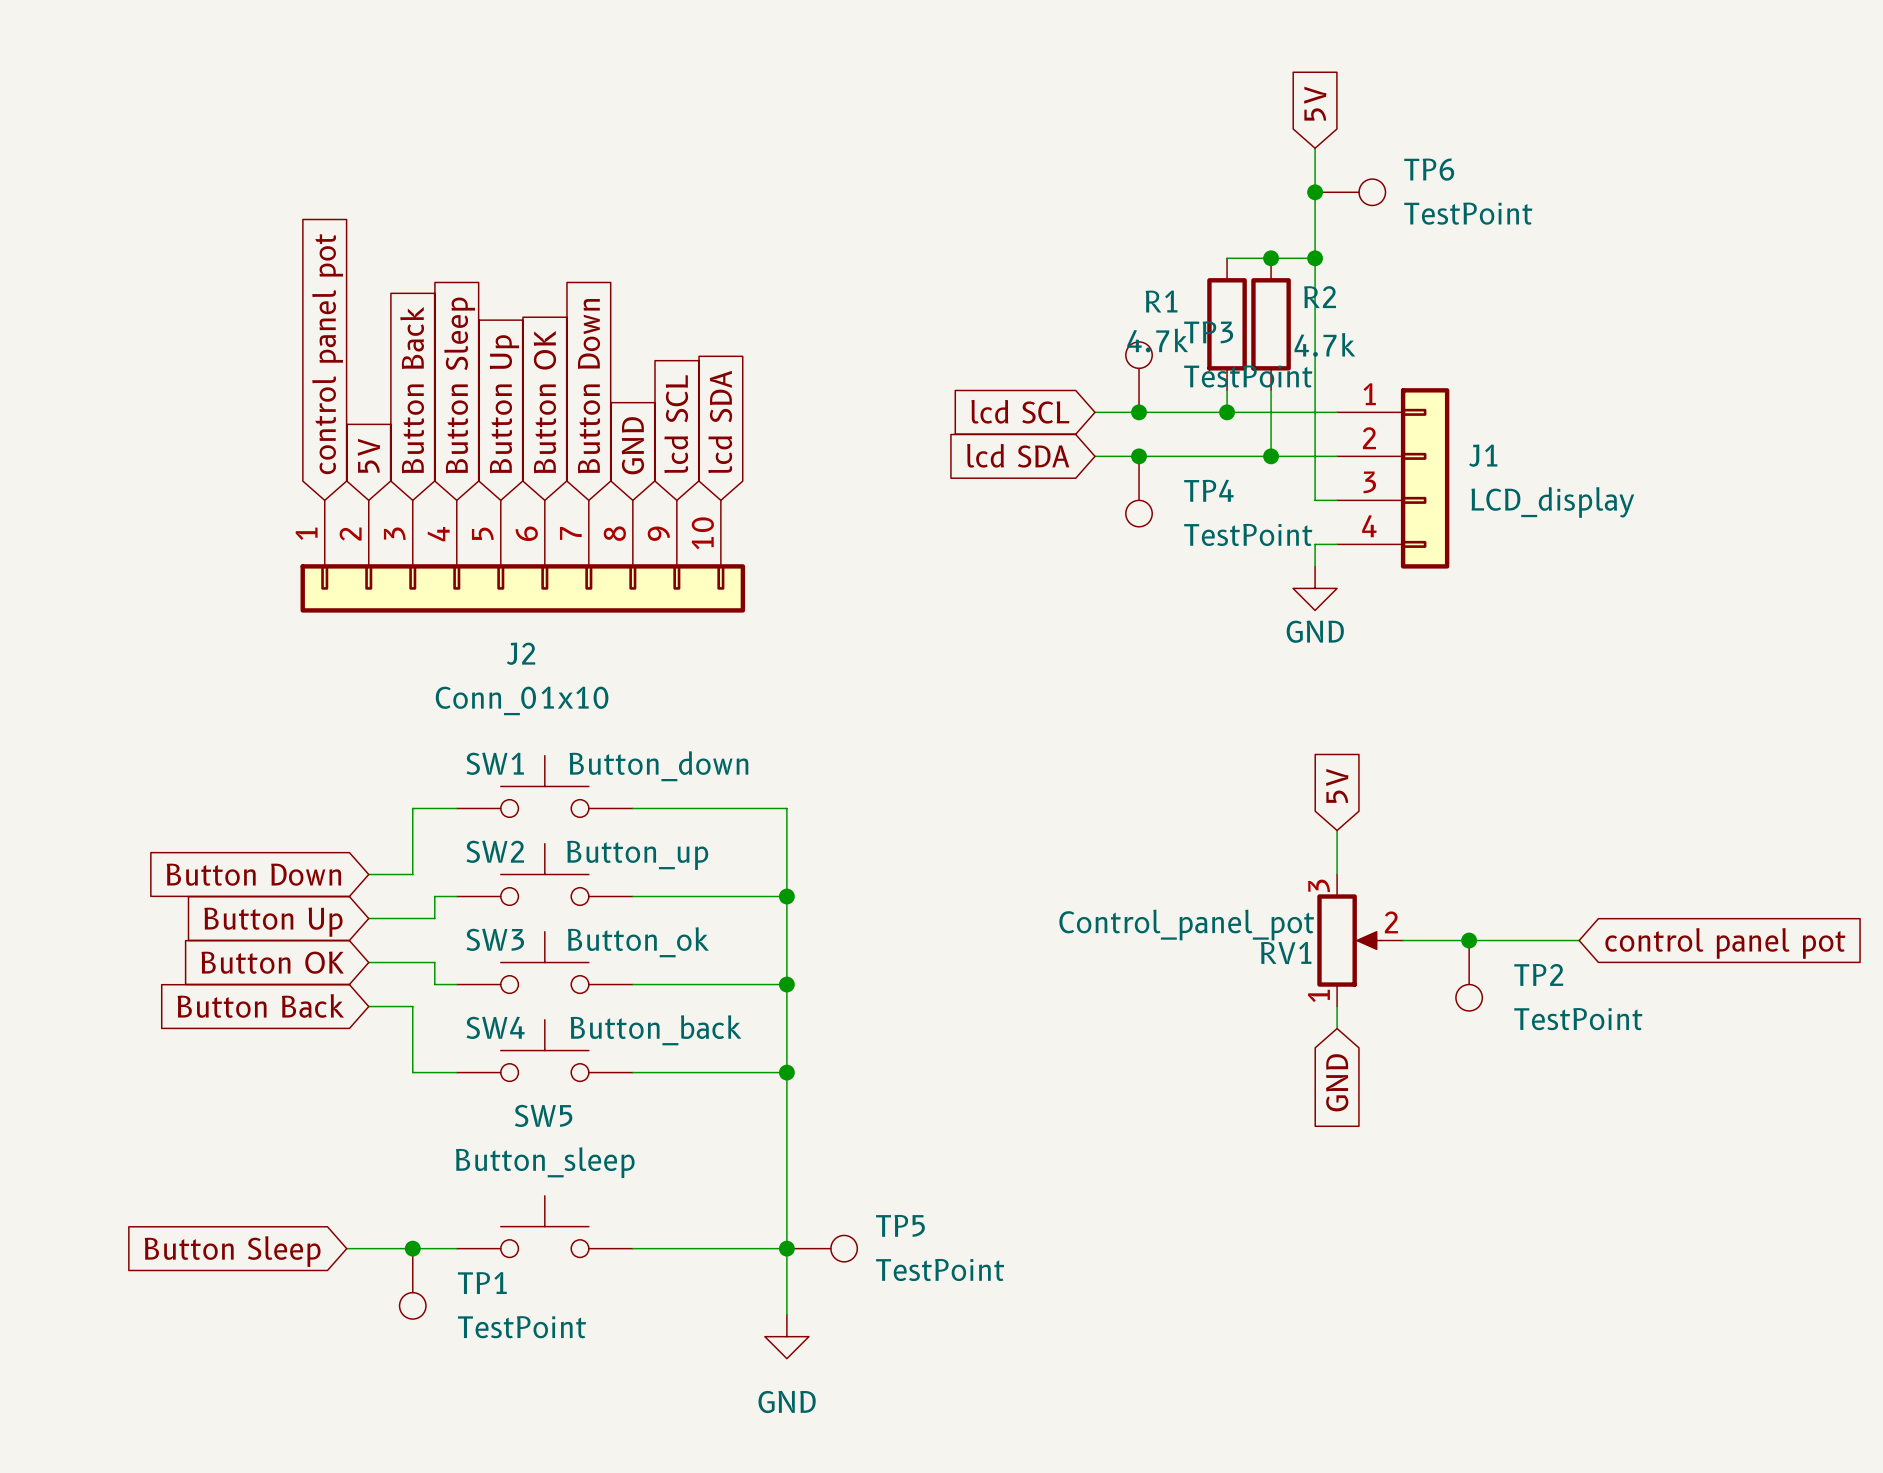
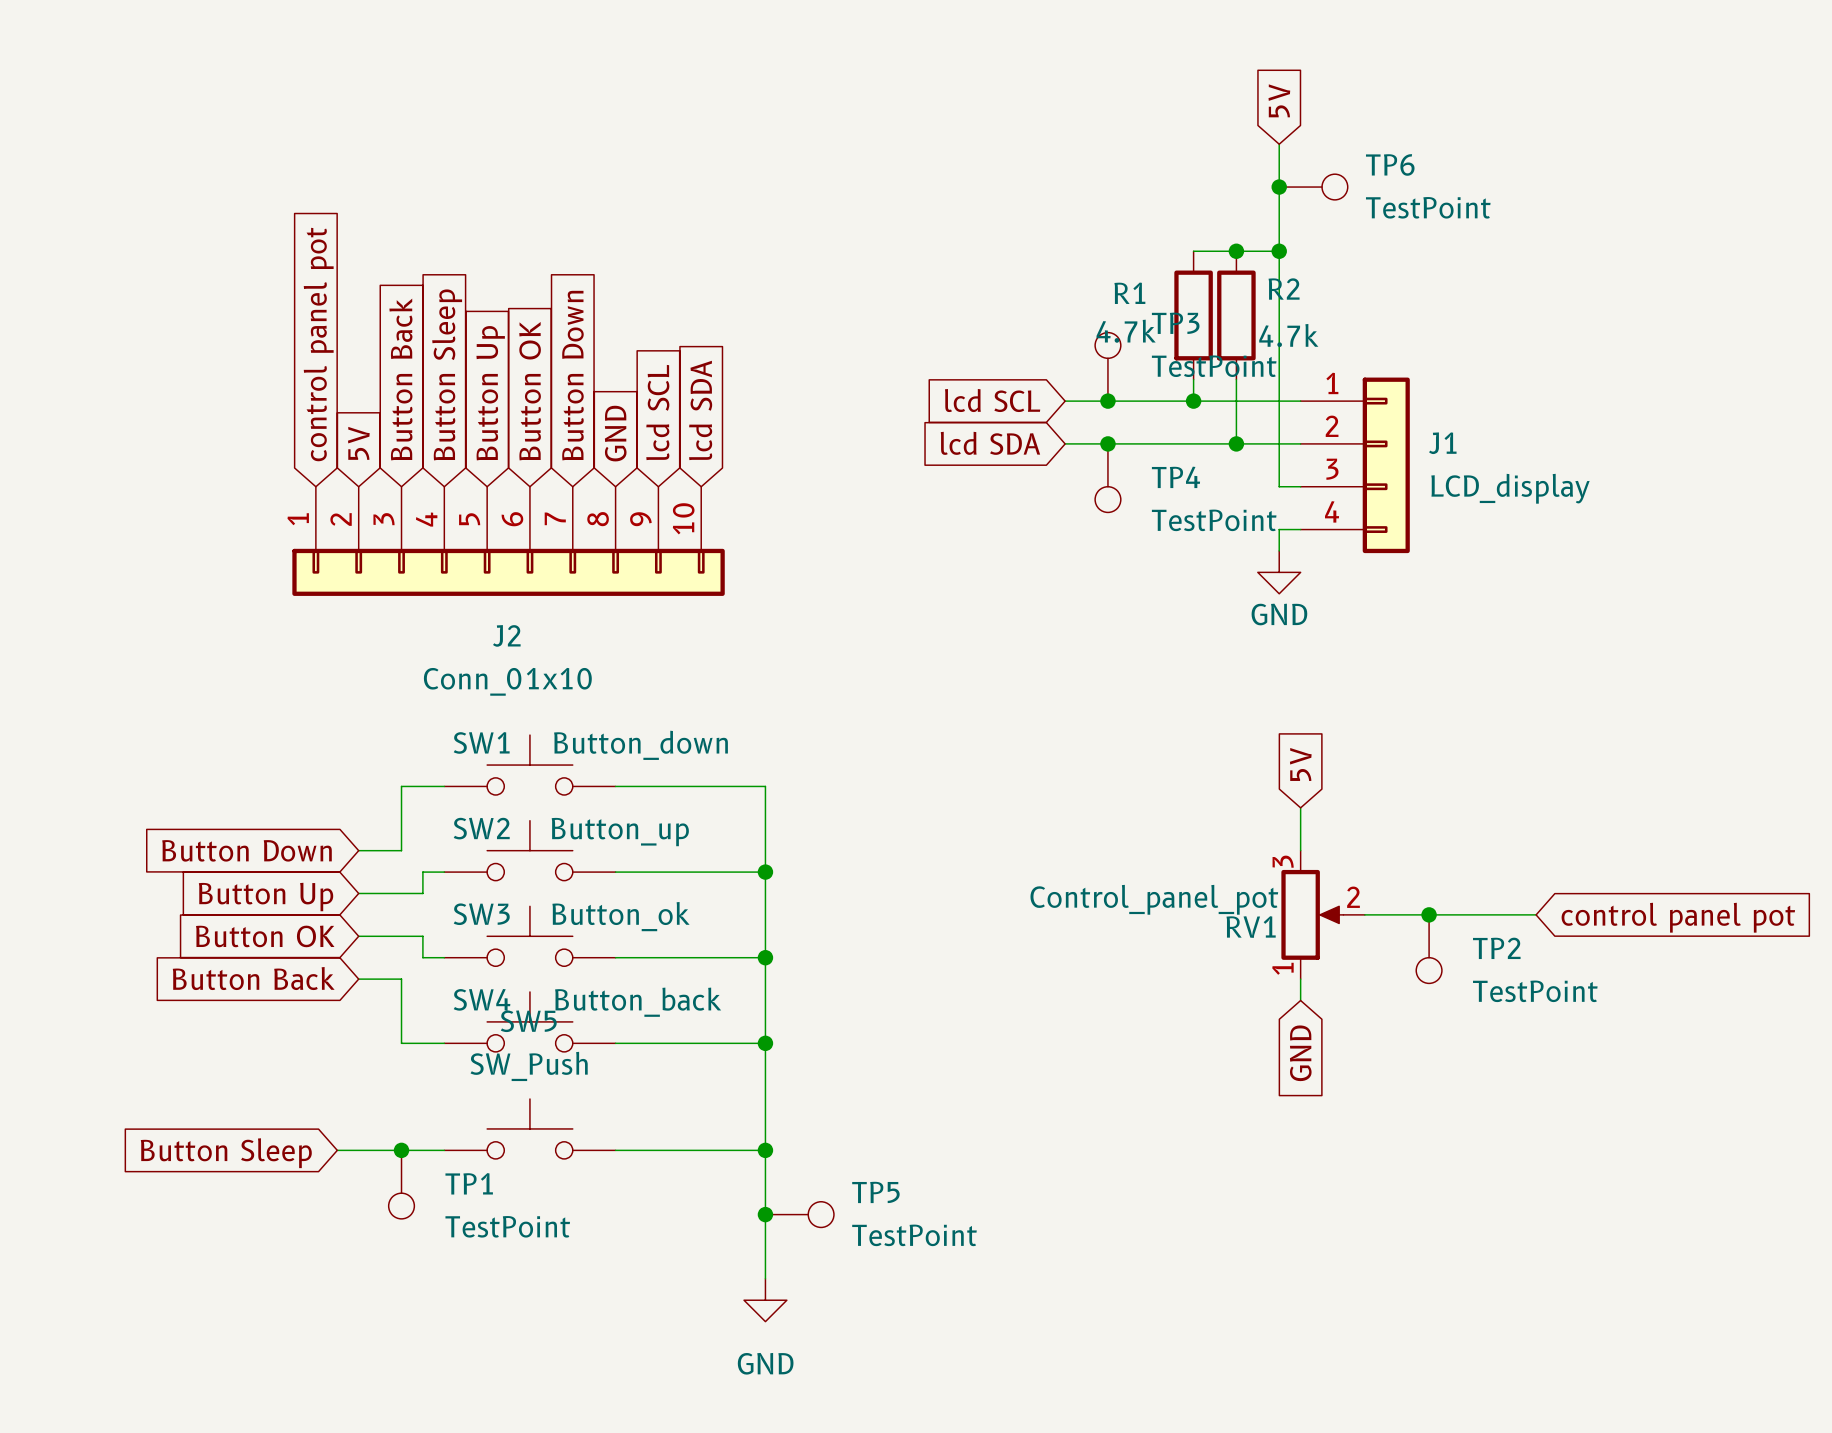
SW5 value: Button_sleep (545, 1162) -> SW_Push (529, 1066)
junction: none -> (765, 1150)
SW5 position: (544, 1226) -> (529, 1128)
wire: (346, 1248) (456, 1248) -> (337, 1150) (444, 1150)
junction position: (412, 1248) -> (401, 1150)
wire: (632, 1248) (786, 1248) -> (615, 1150) (765, 1150)
global label position: Button Sleep (232, 1251) -> Button Sleep (226, 1153)
TP1 position: (412, 1283) -> (401, 1184)

